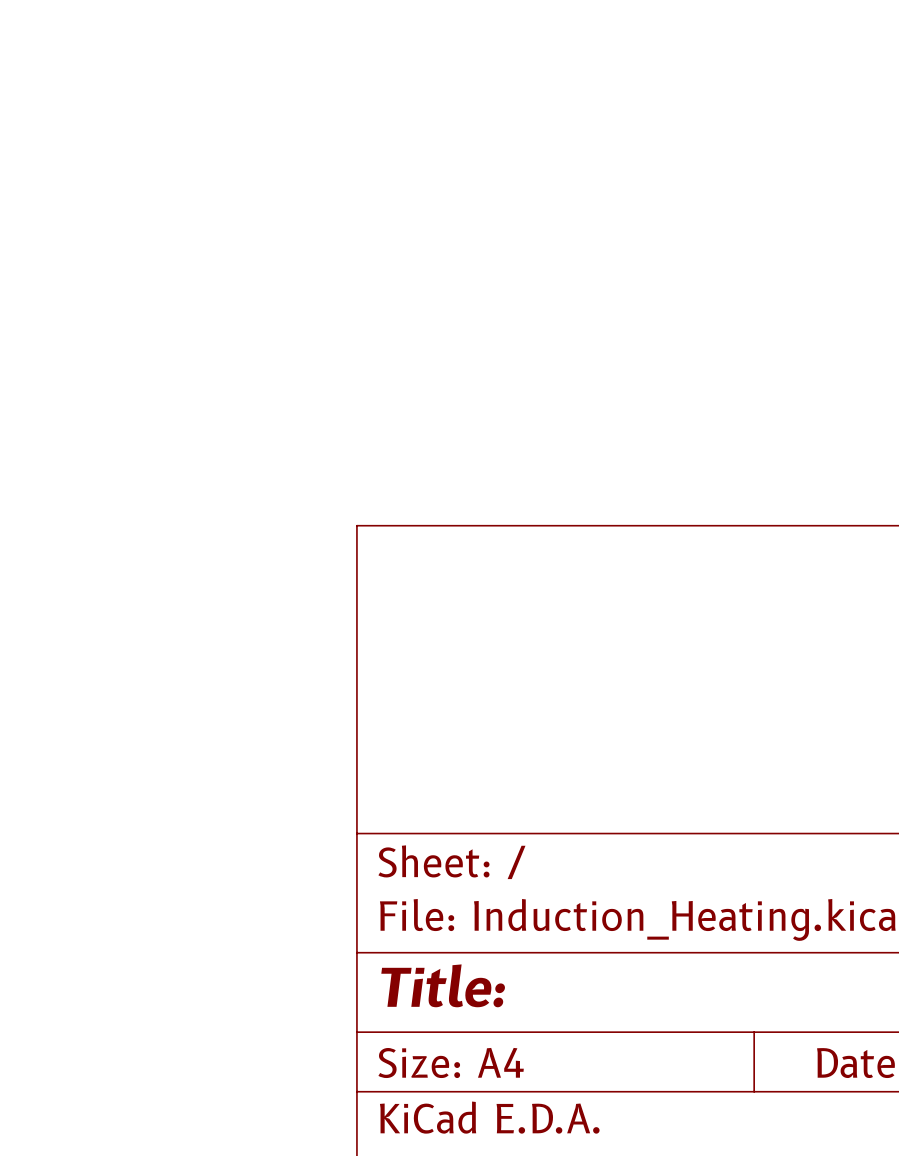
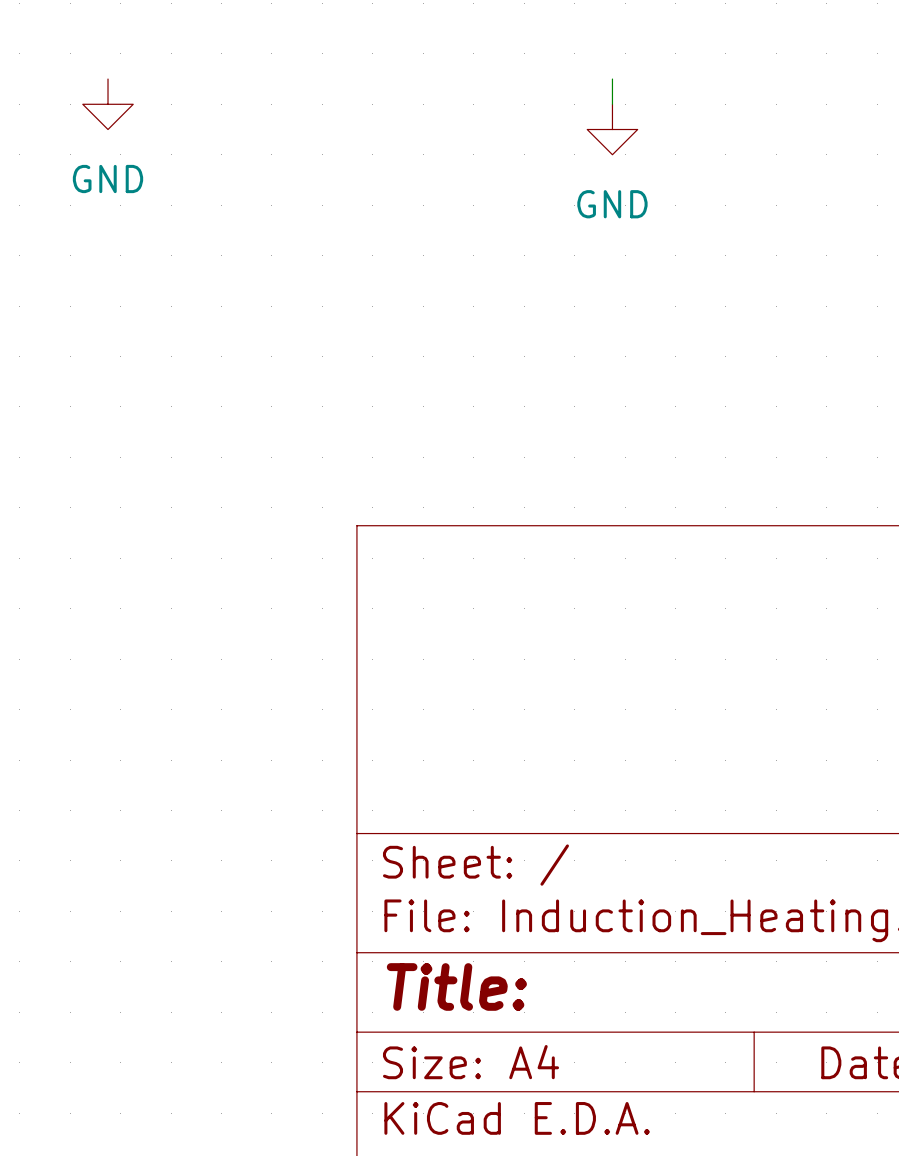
wire: none -> (612, 79) (612, 104)
power symbol: none -> GND (108, 104)
power symbol: none -> GND (612, 129)

